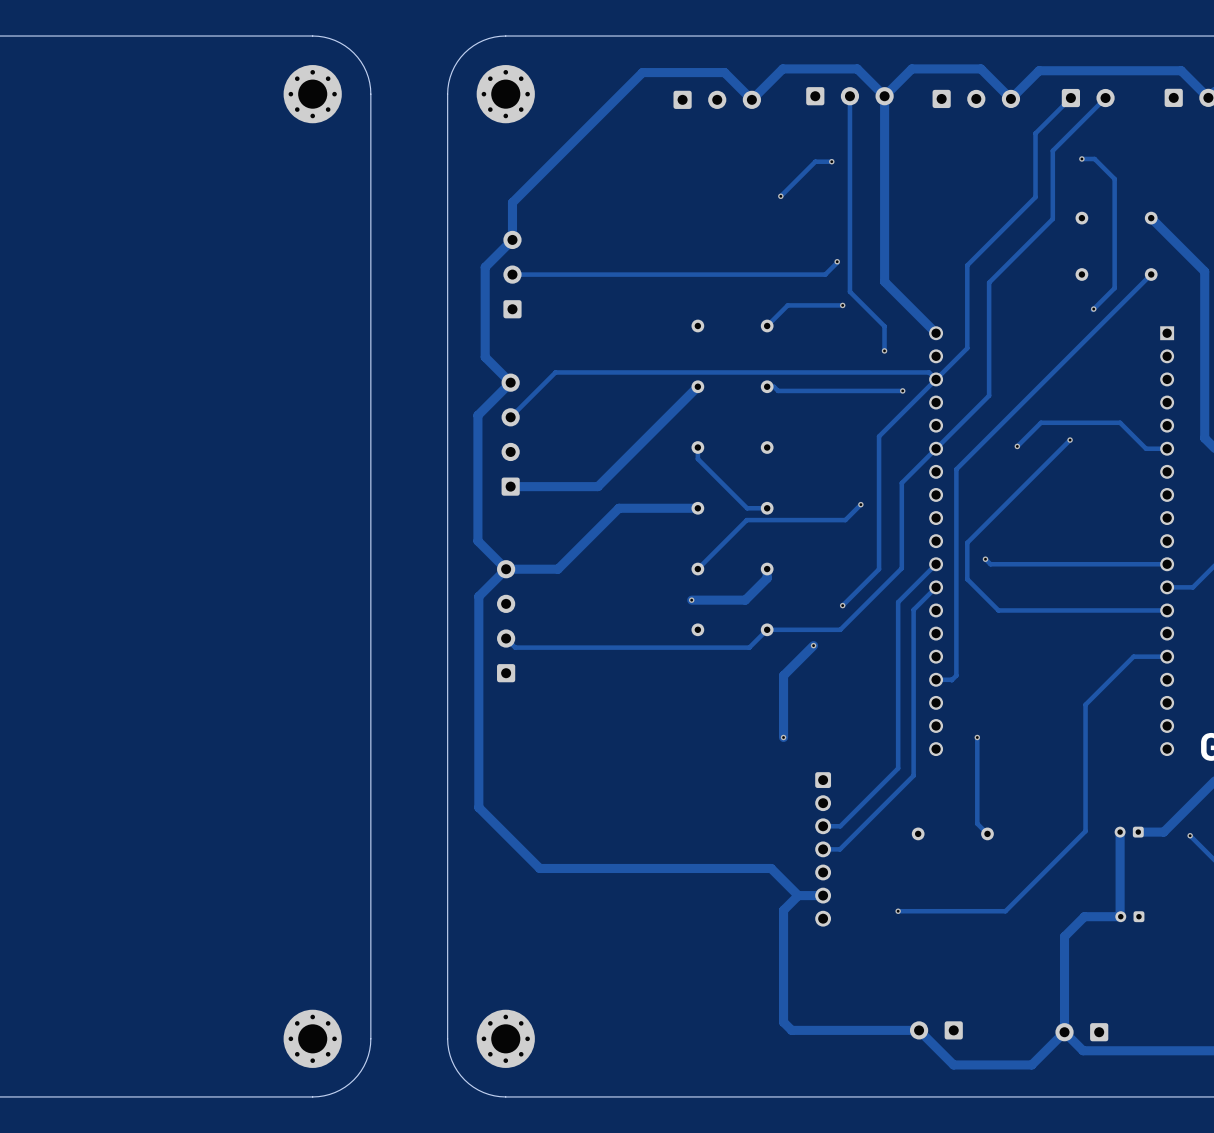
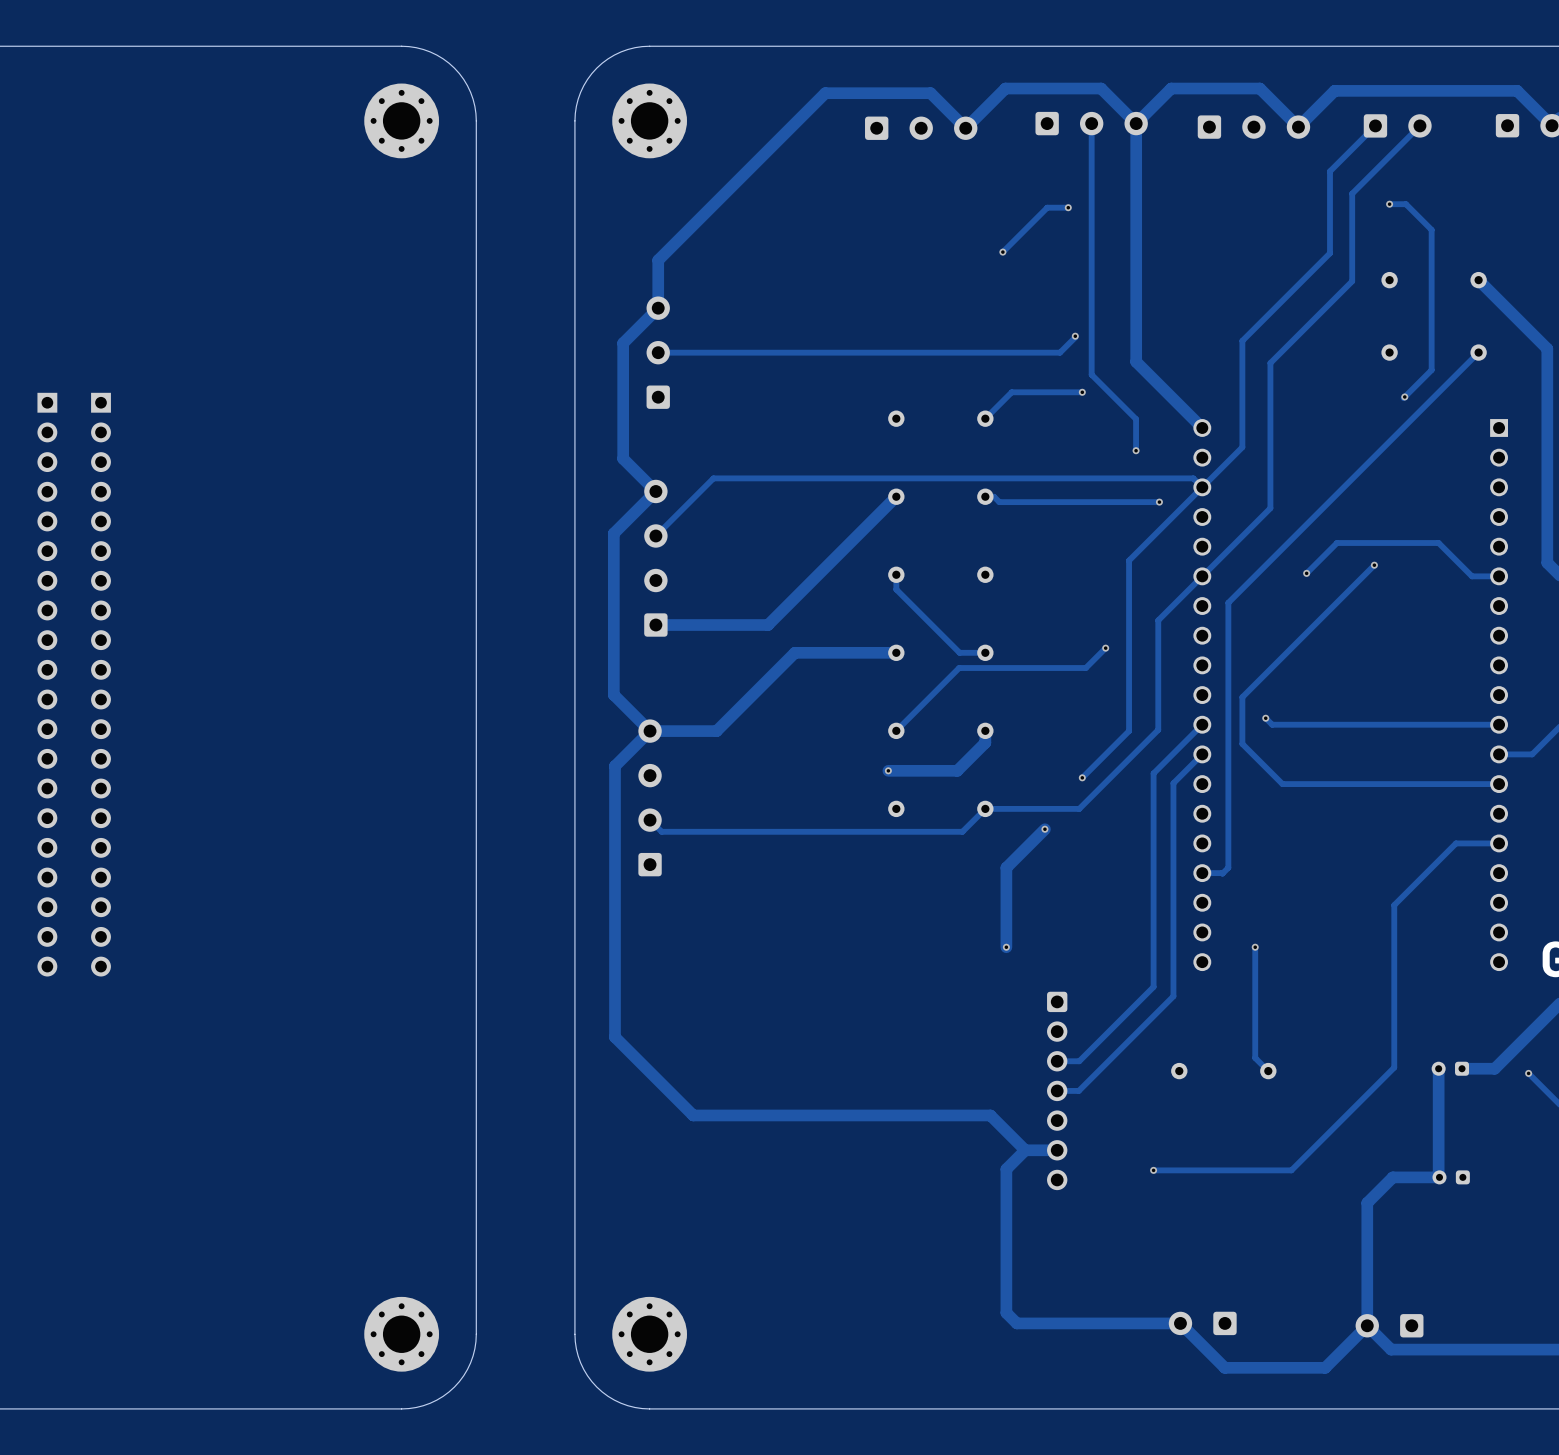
part: none -> (47, 684)
part: none -> (101, 684)

